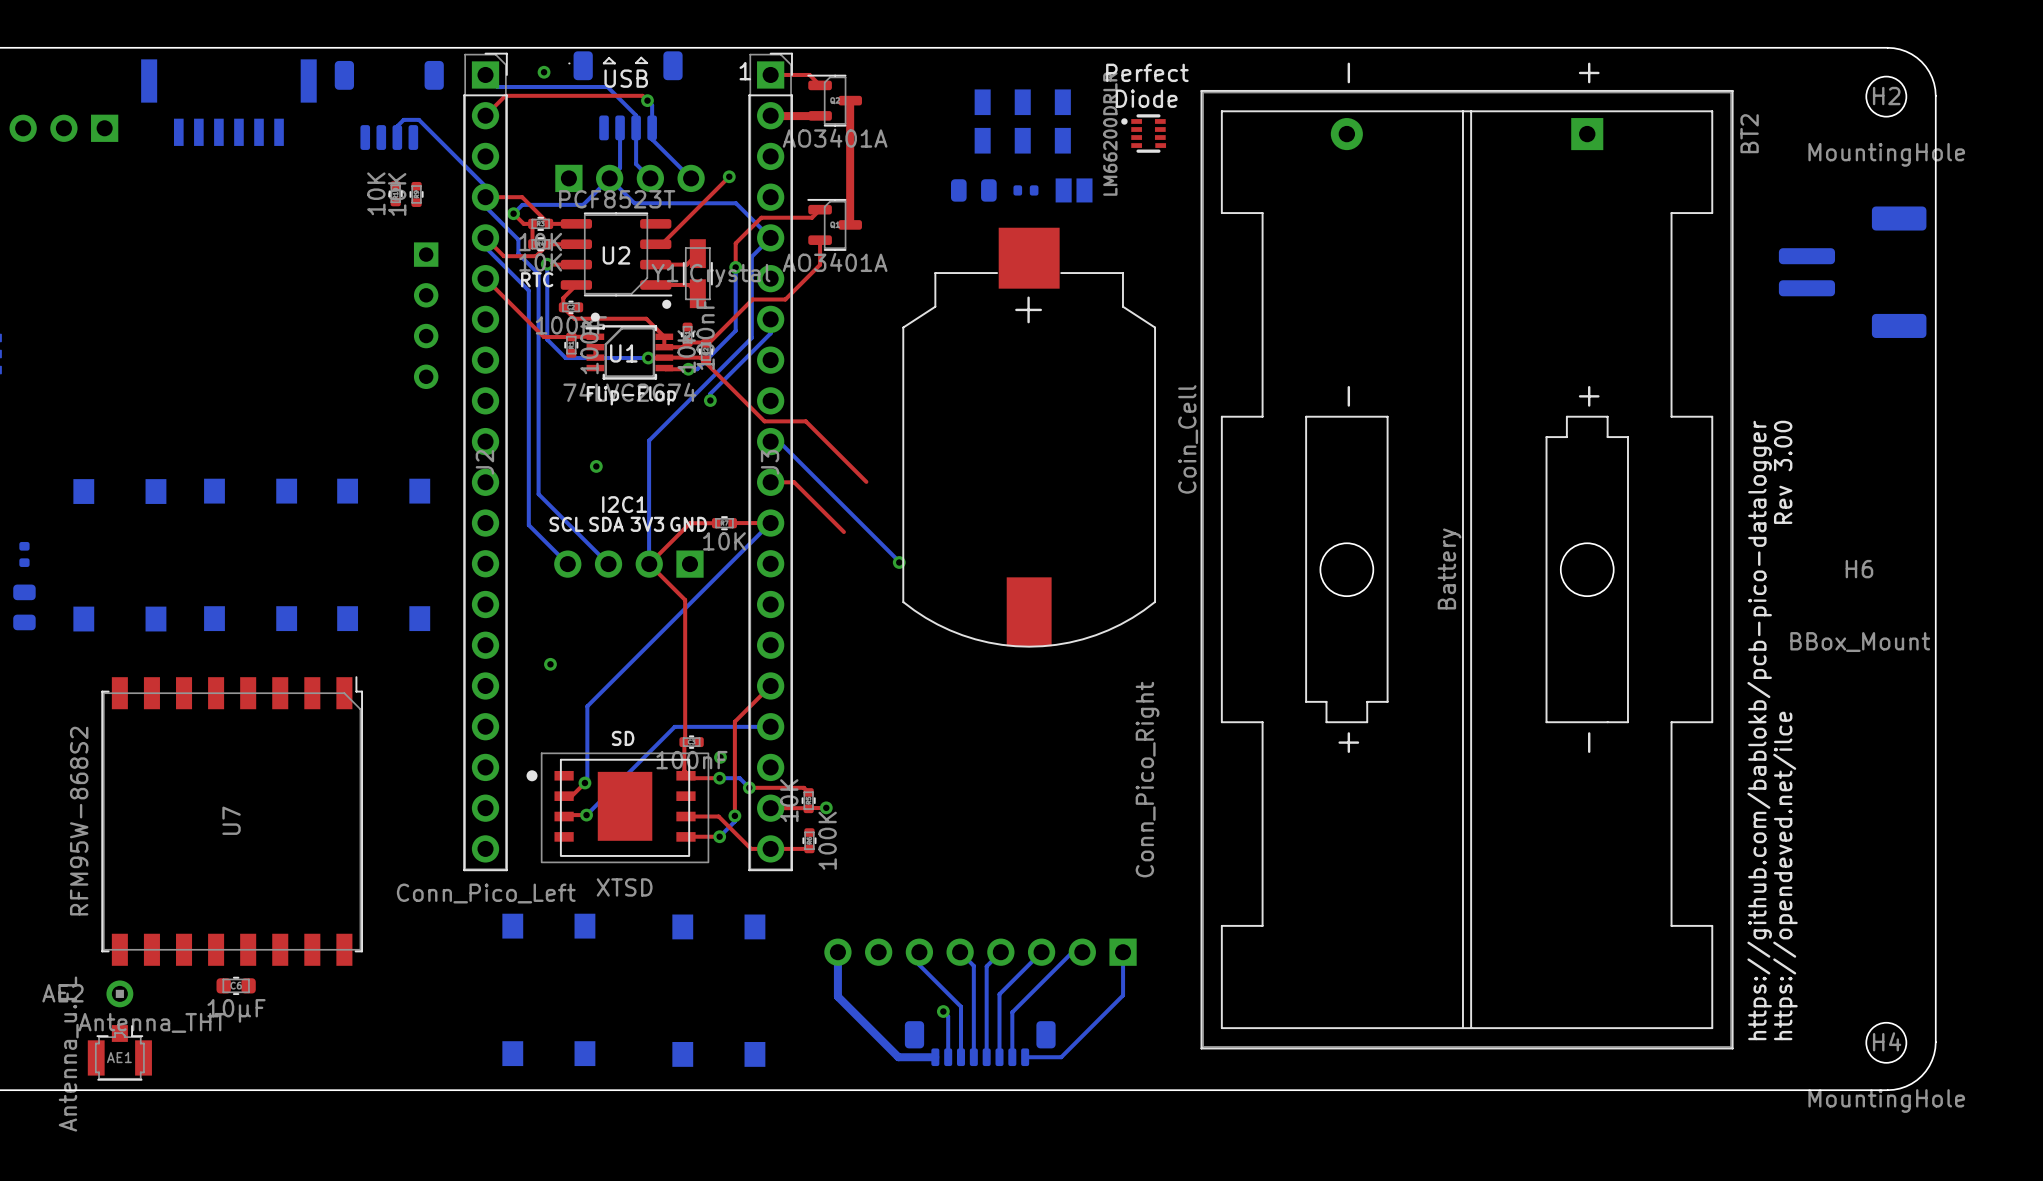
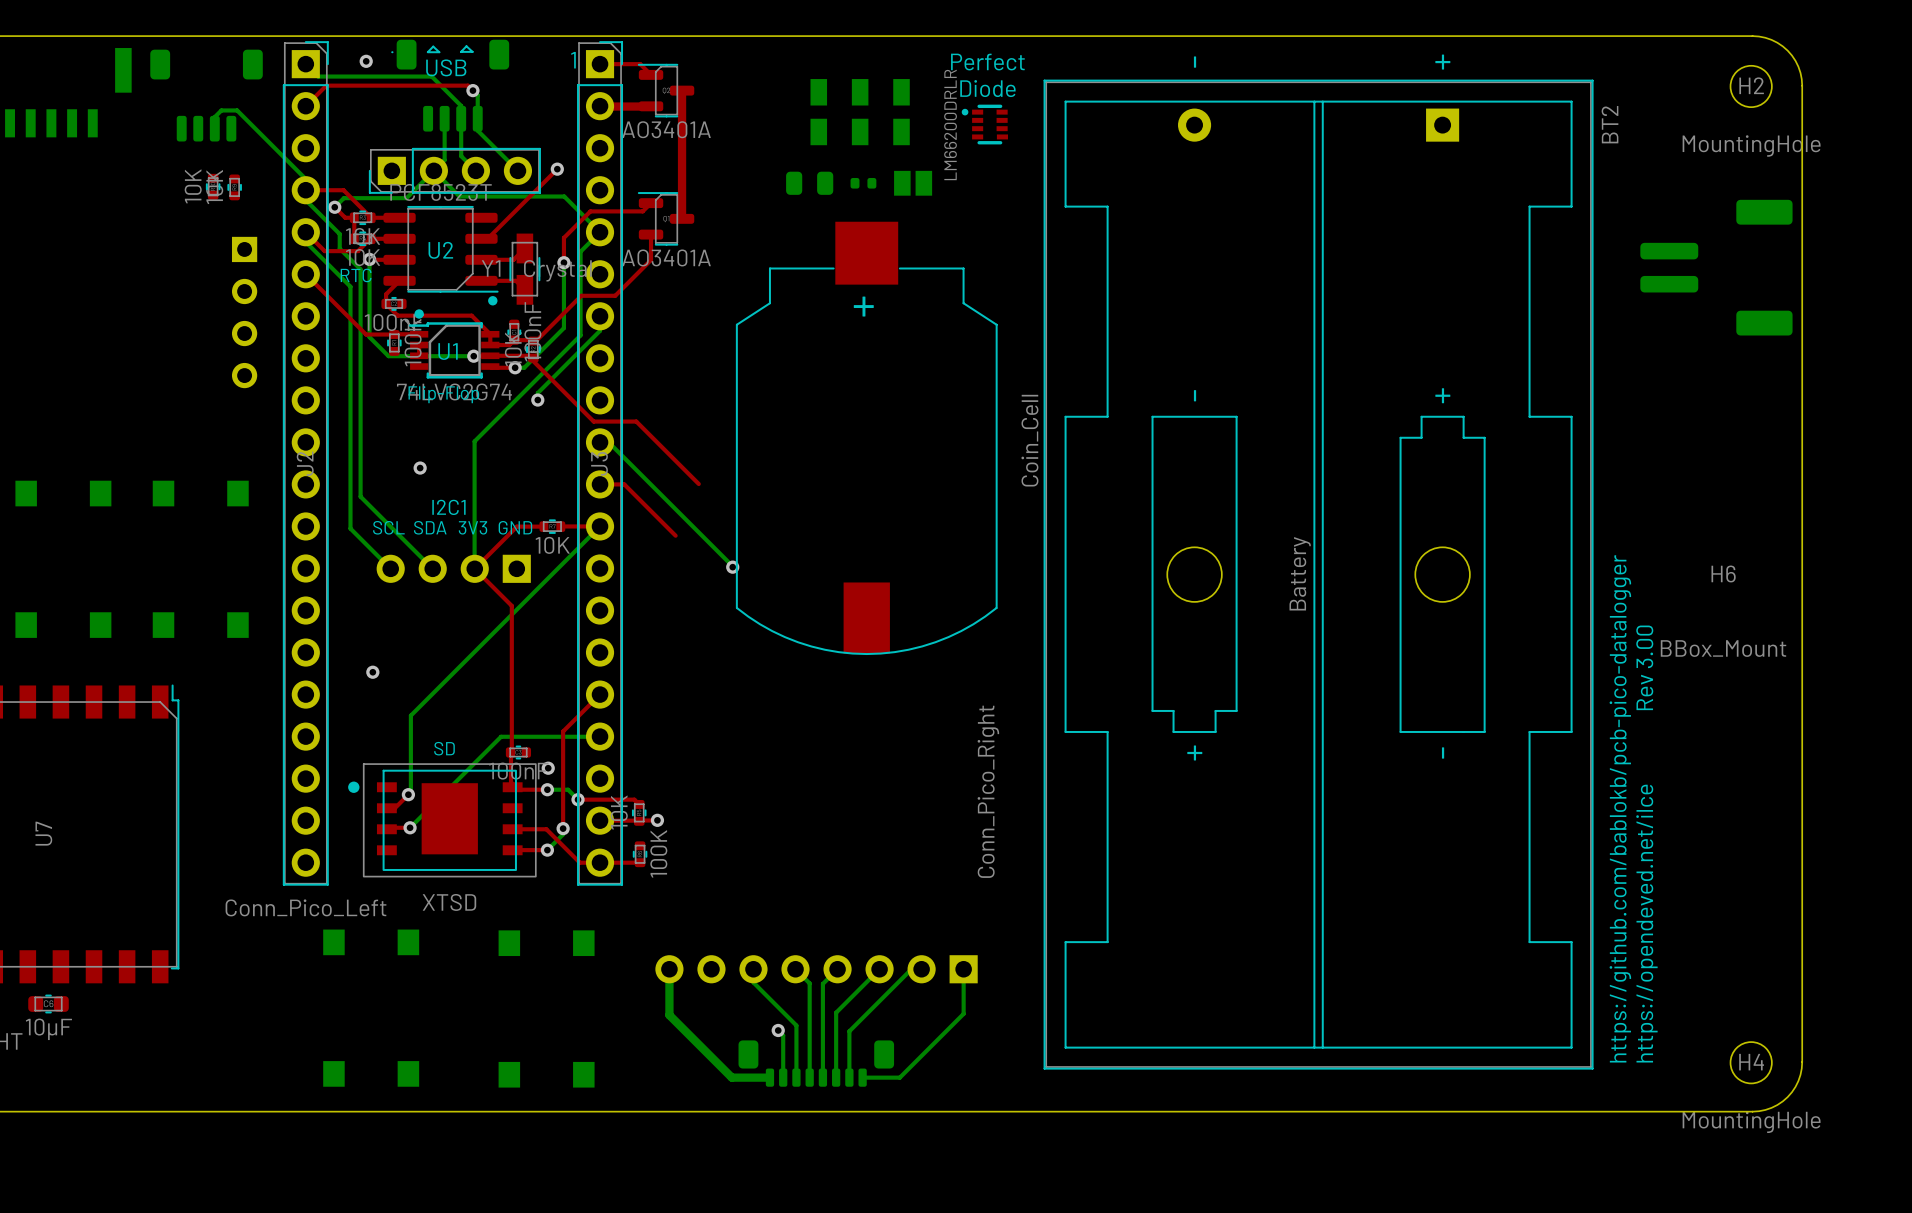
part side: bottom (630, 178) -> top (454, 170)

